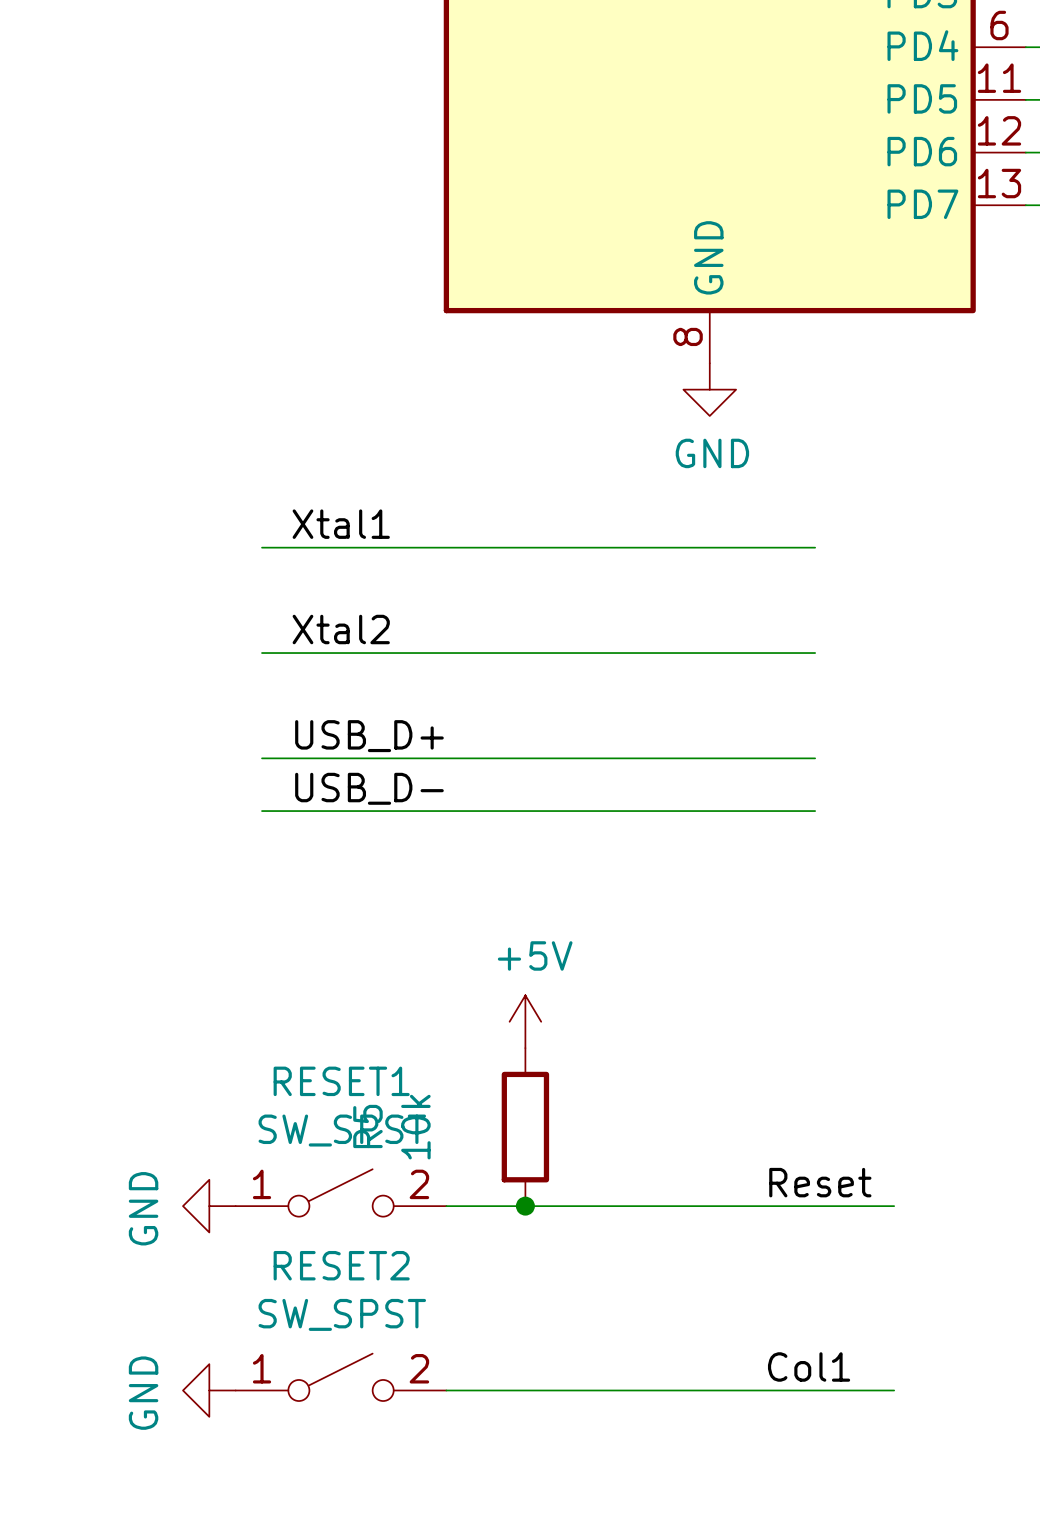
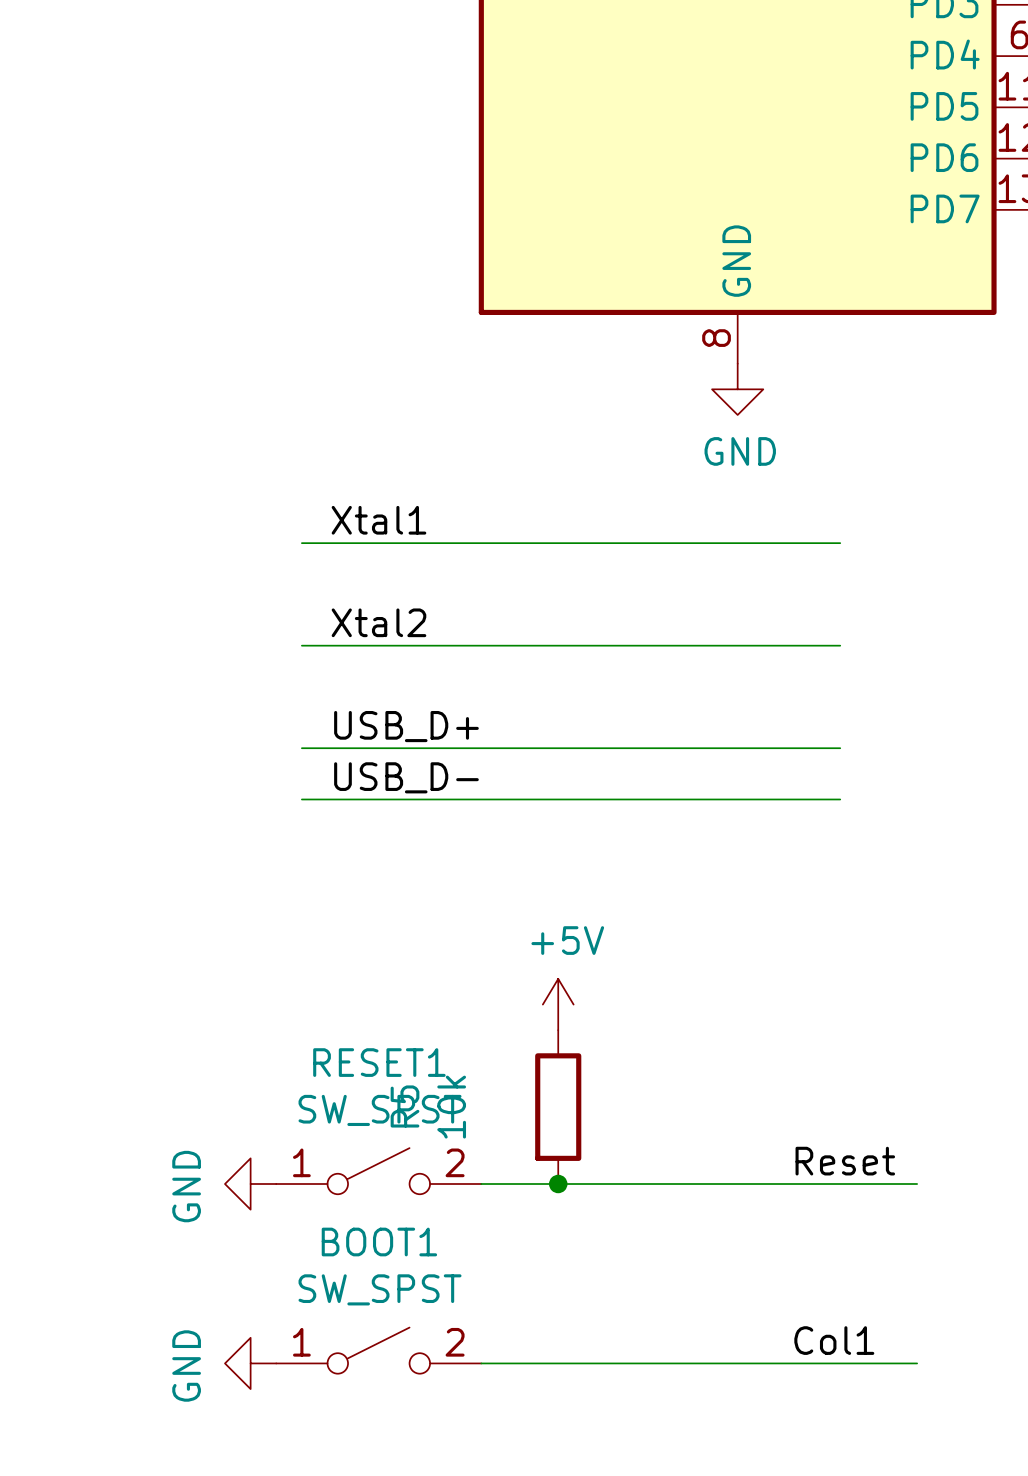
RESET2 name: RESET2 (341, 1265) -> BOOT1 (379, 1242)

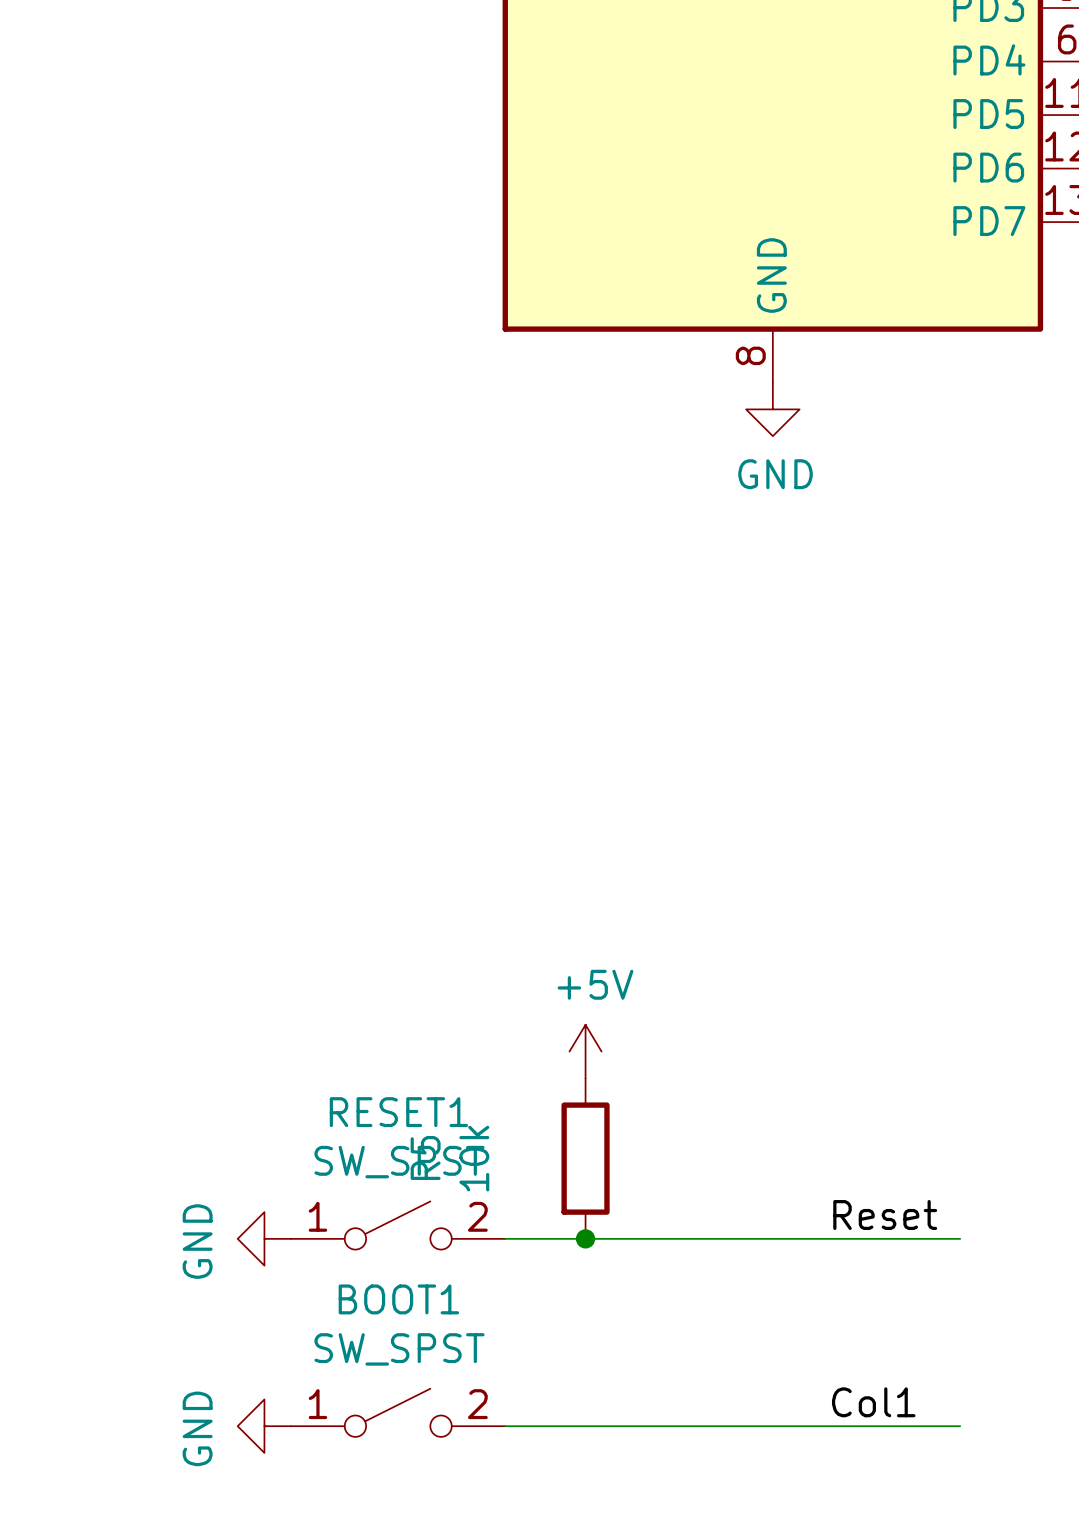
label: Xtal1 (378, 520) -> none
wire: (301, 543) (840, 543) -> none
label: Xtal2 (378, 622) -> none
wire: (301, 645) (840, 645) -> none
label: USB_D+ (406, 726) -> none
wire: (301, 748) (840, 748) -> none
label: USB_D- (406, 777) -> none
wire: (301, 799) (840, 799) -> none

